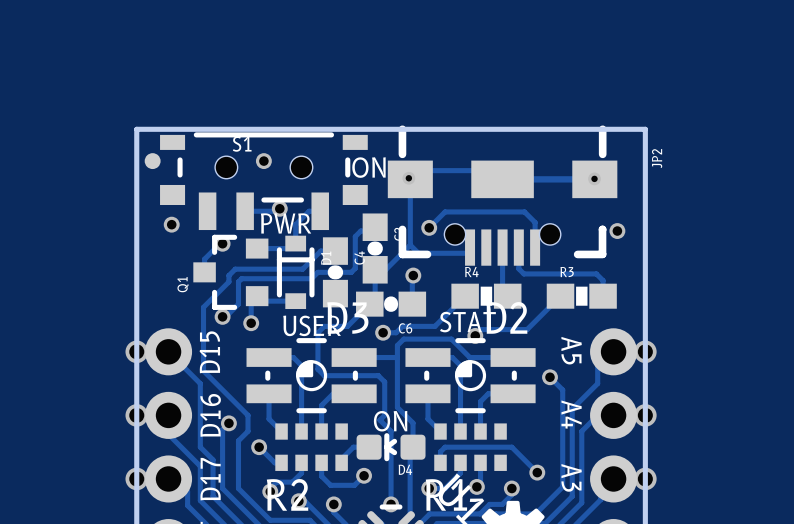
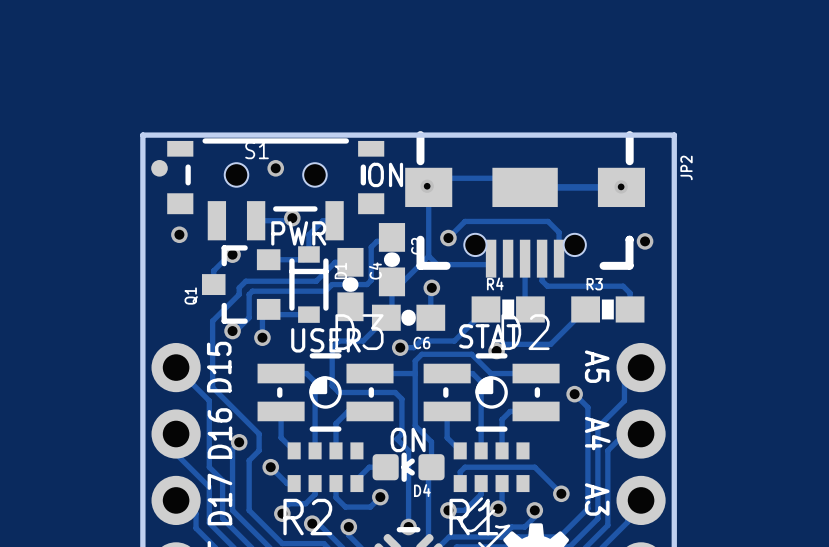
via: (136, 351) -> none
via: (645, 351) -> none
via: (136, 415) -> none
via: (645, 415) -> none
via: (136, 478) -> none
via: (645, 478) -> none

